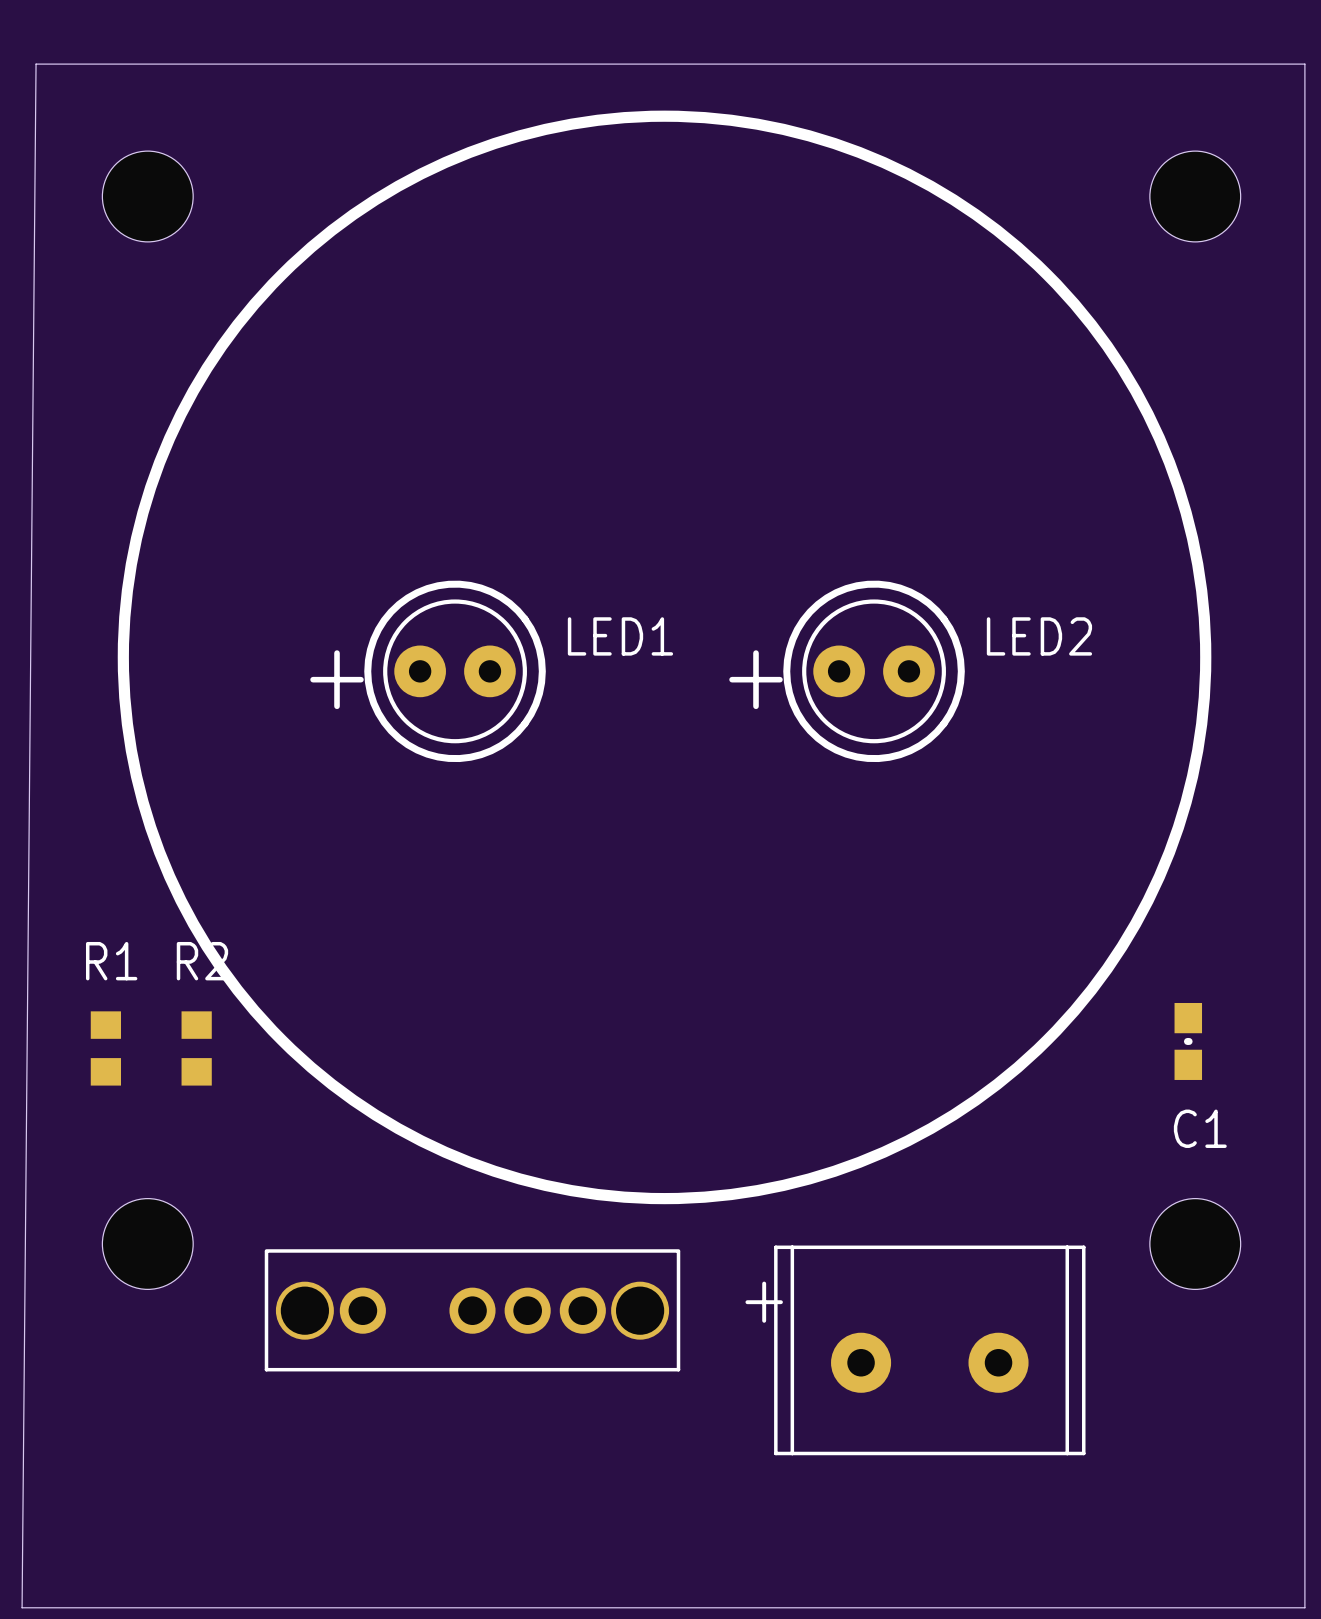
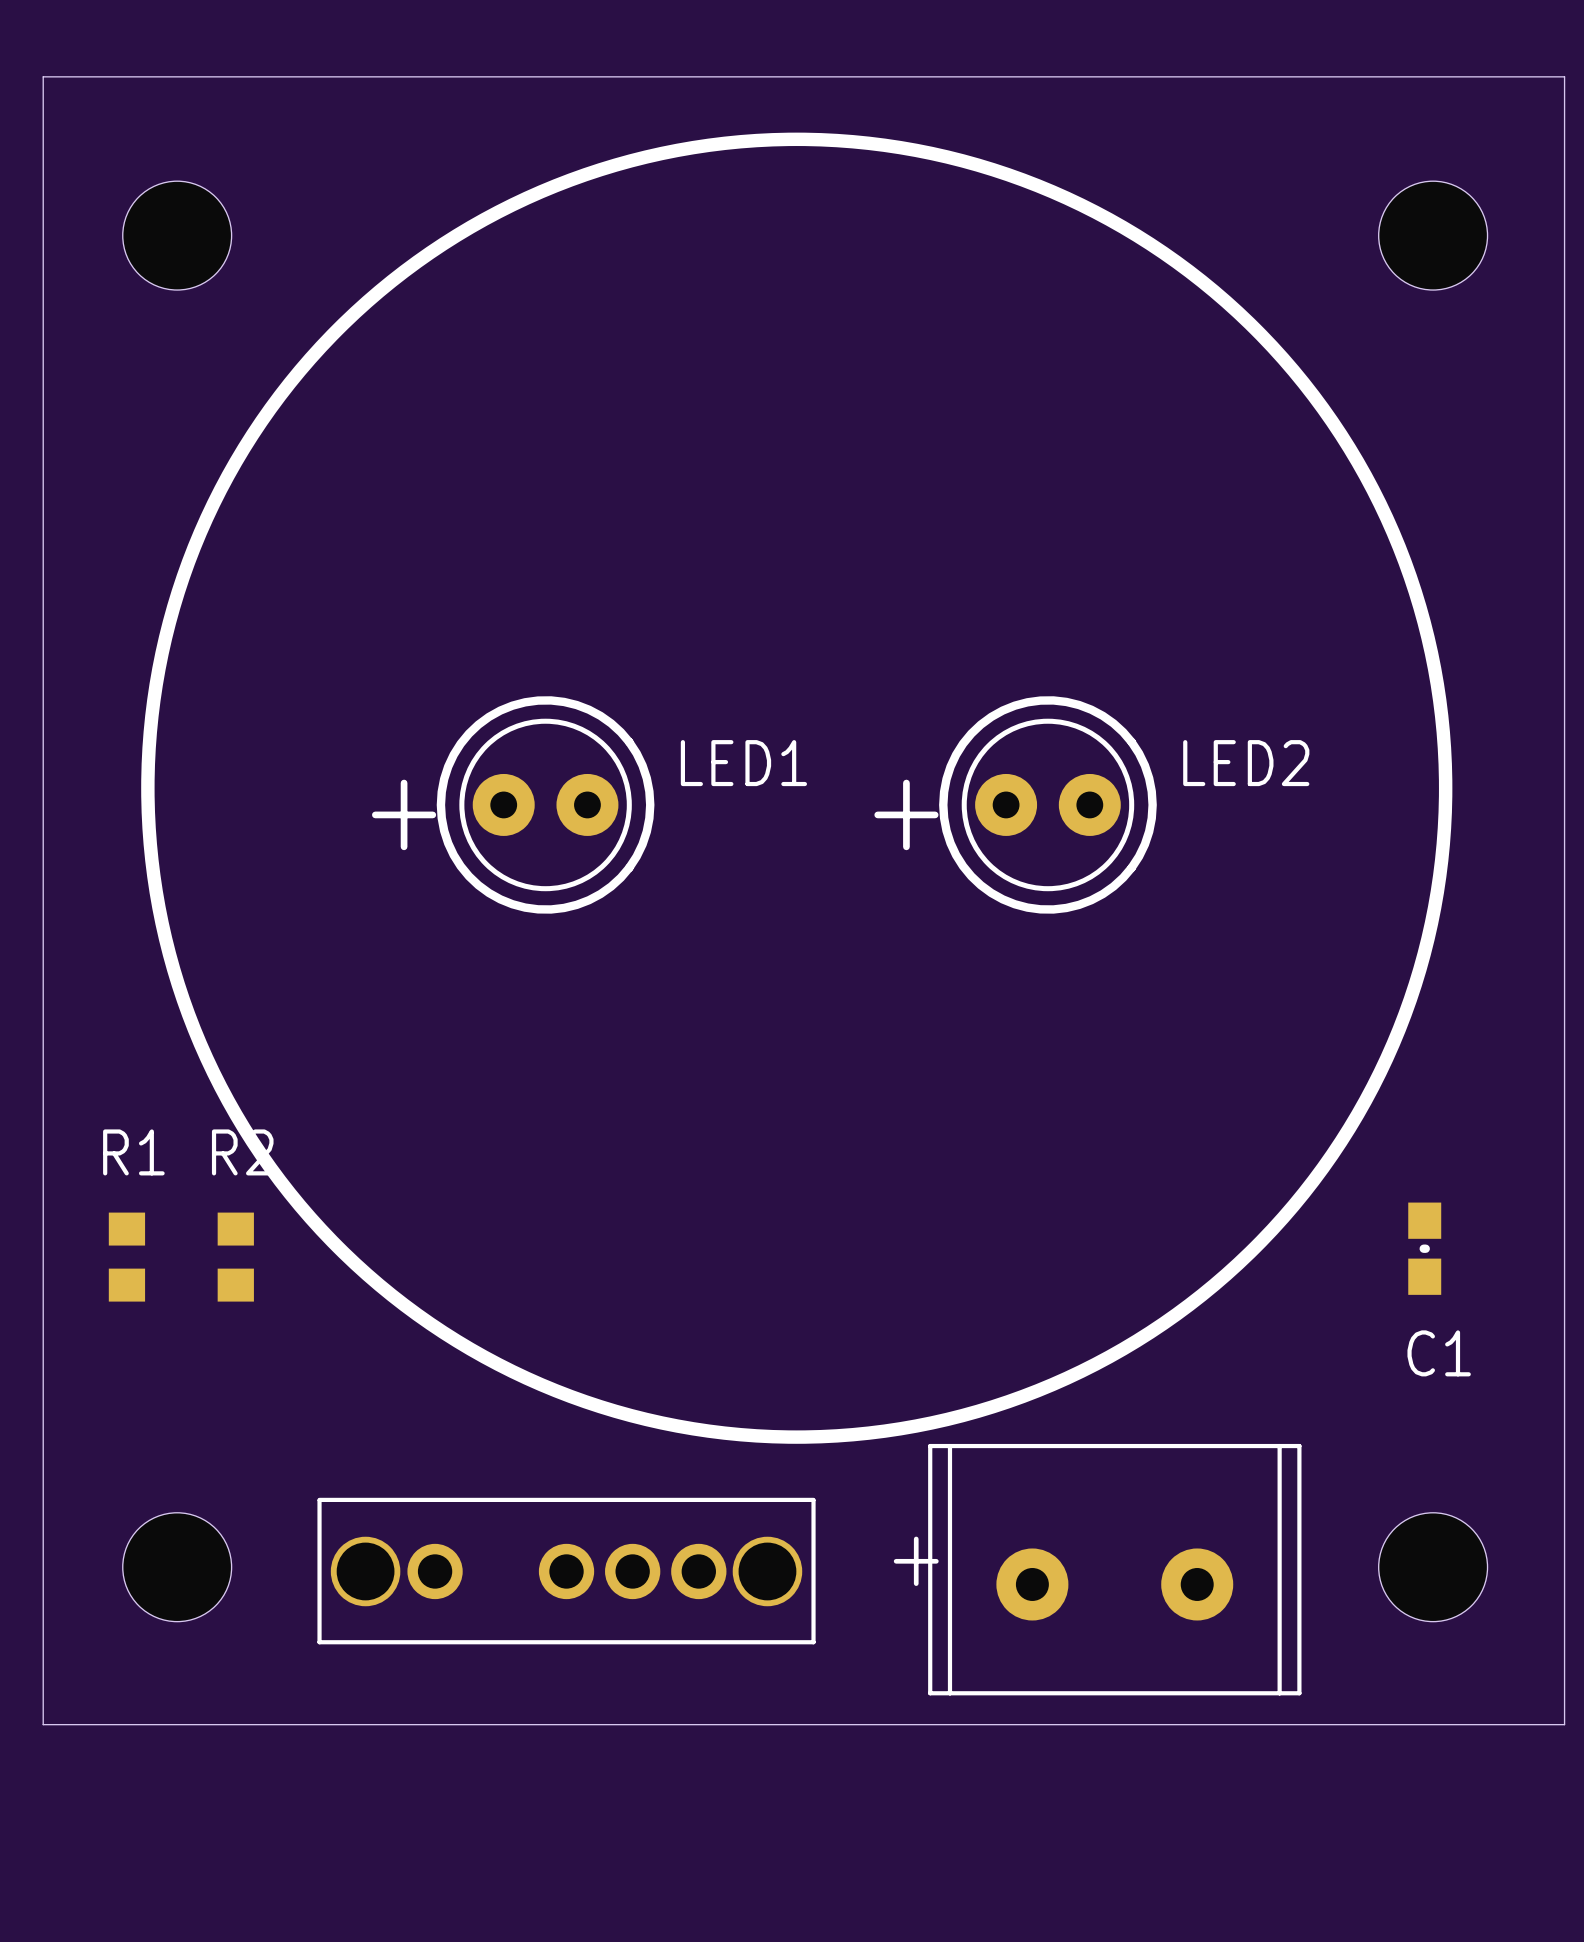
board edge: (36, 64) (22, 1607) (1304, 1607) (1304, 1438) -> (43, 76) (43, 1724) (1564, 1724)
part position: (147, 1243) -> (177, 1567)
part position: (1195, 1243) -> (1433, 1567)
part position: (929, 1350) -> (1114, 1569)

